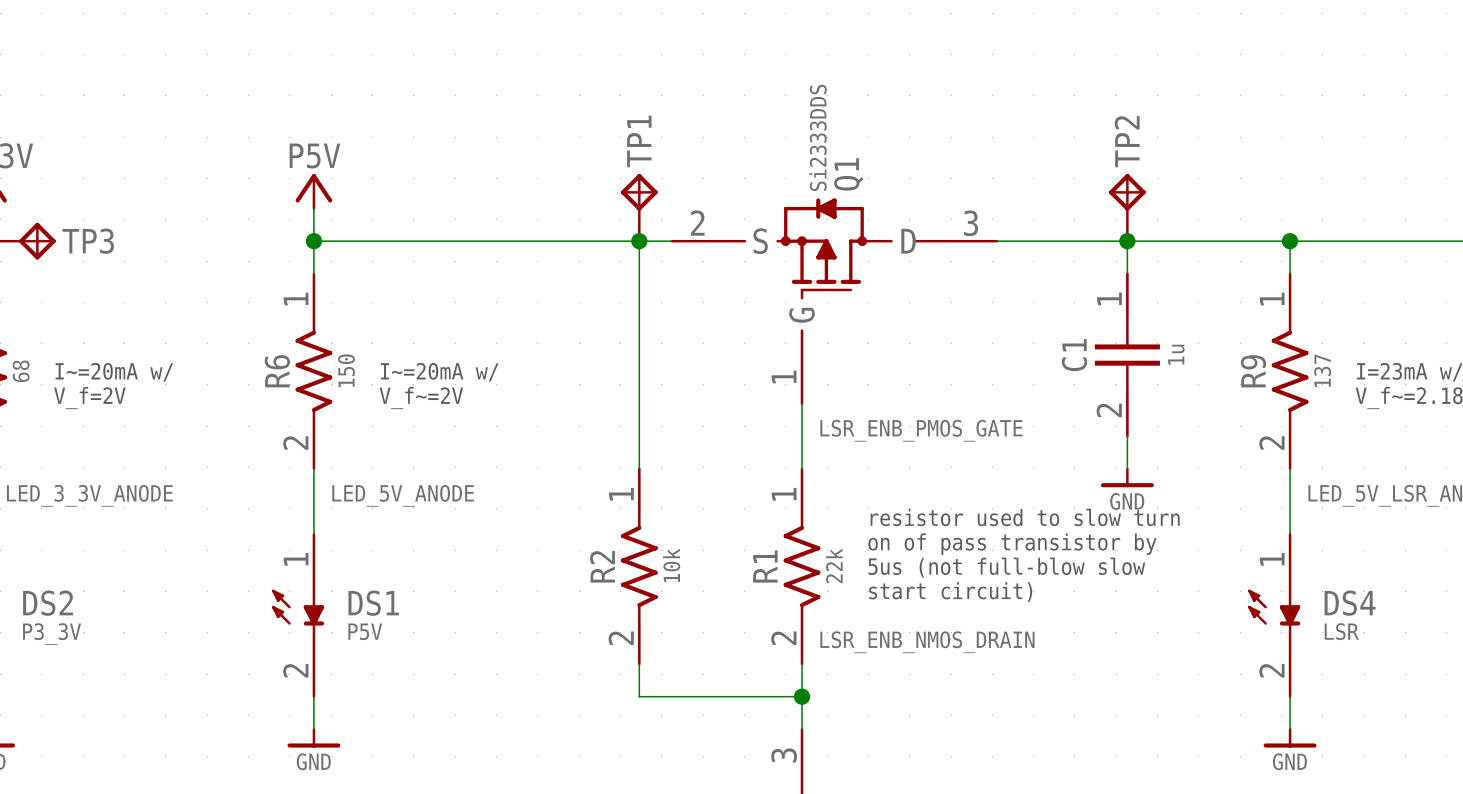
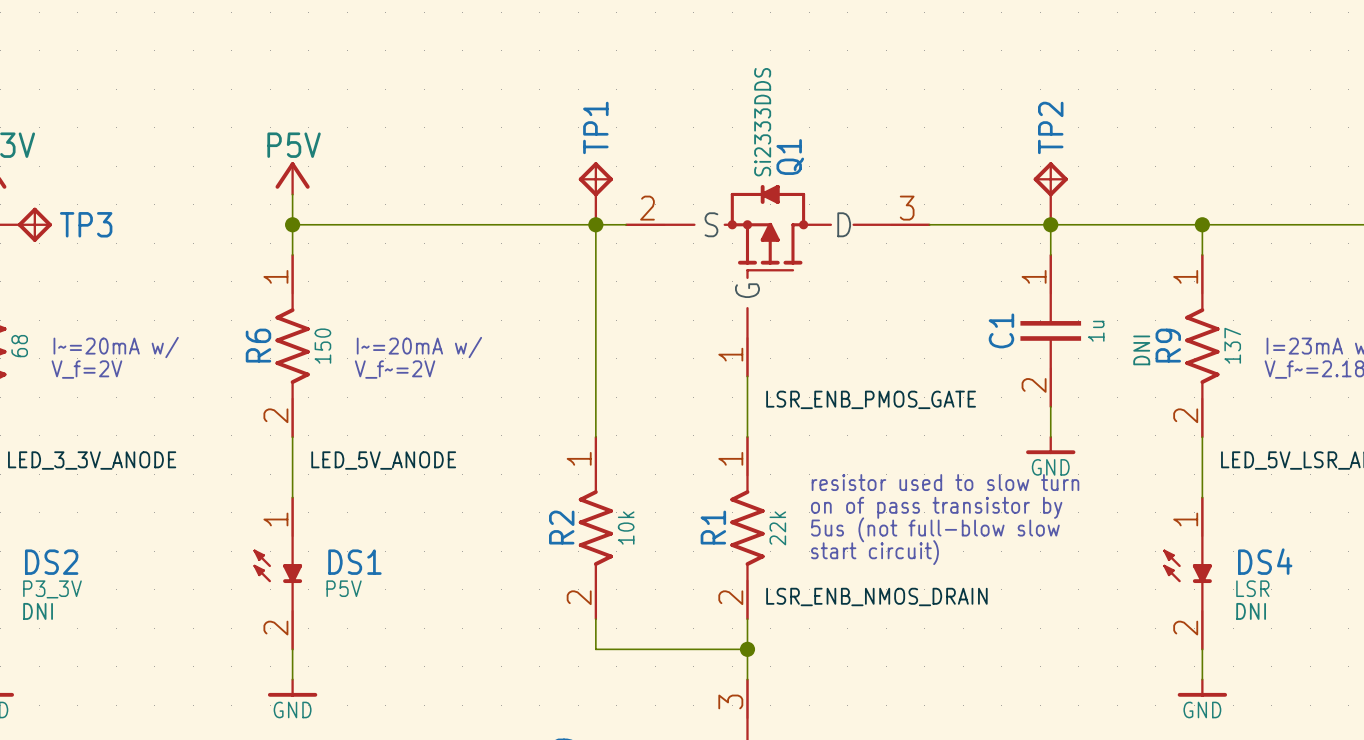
R9 text: none -> DNI (1141, 350)
DS2 text: none -> DNI (38, 611)
DS4 text: none -> DNI (1251, 611)

